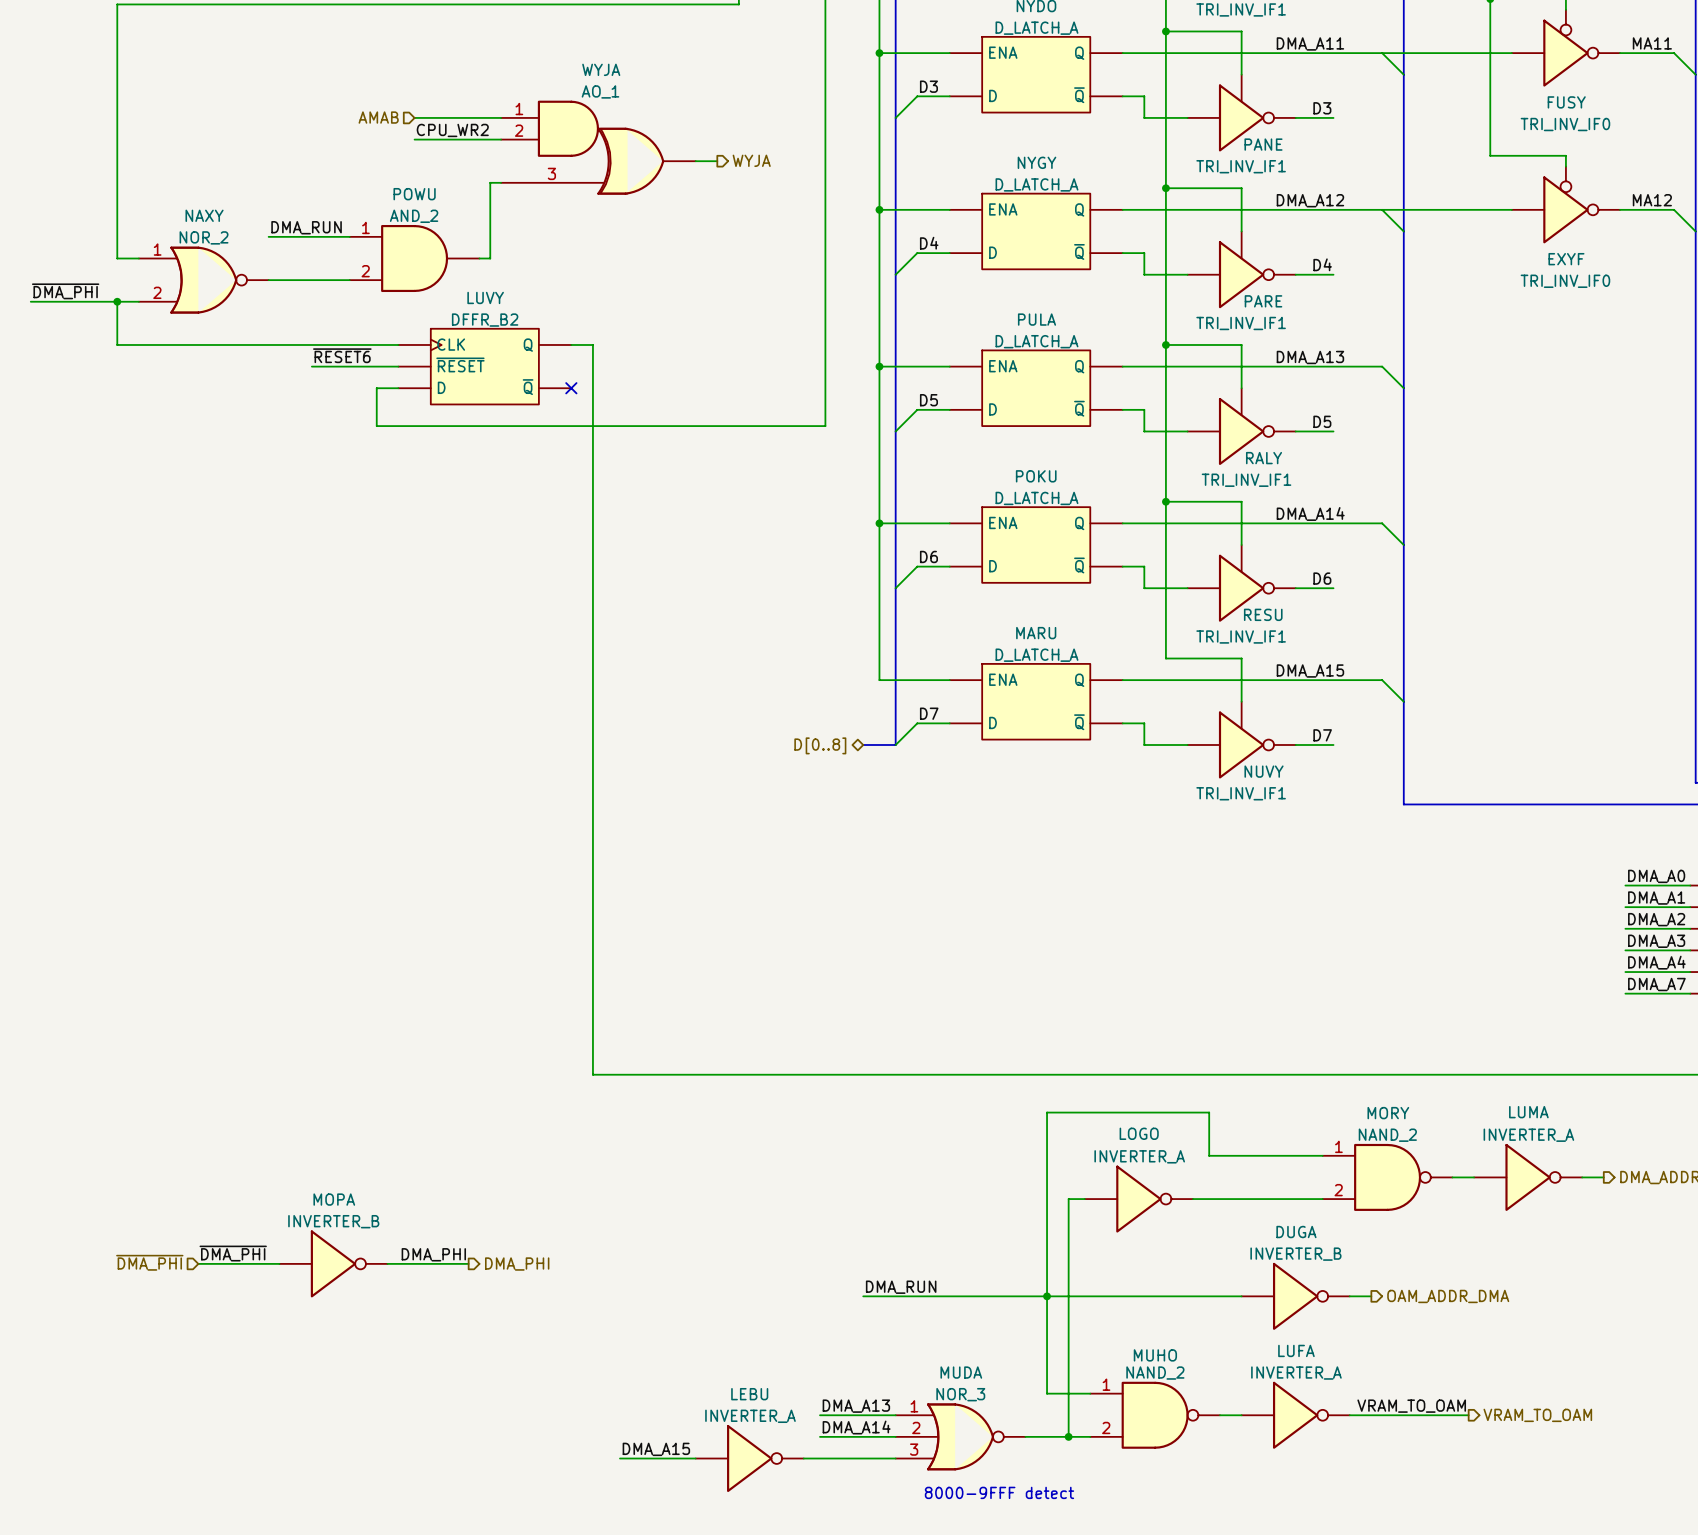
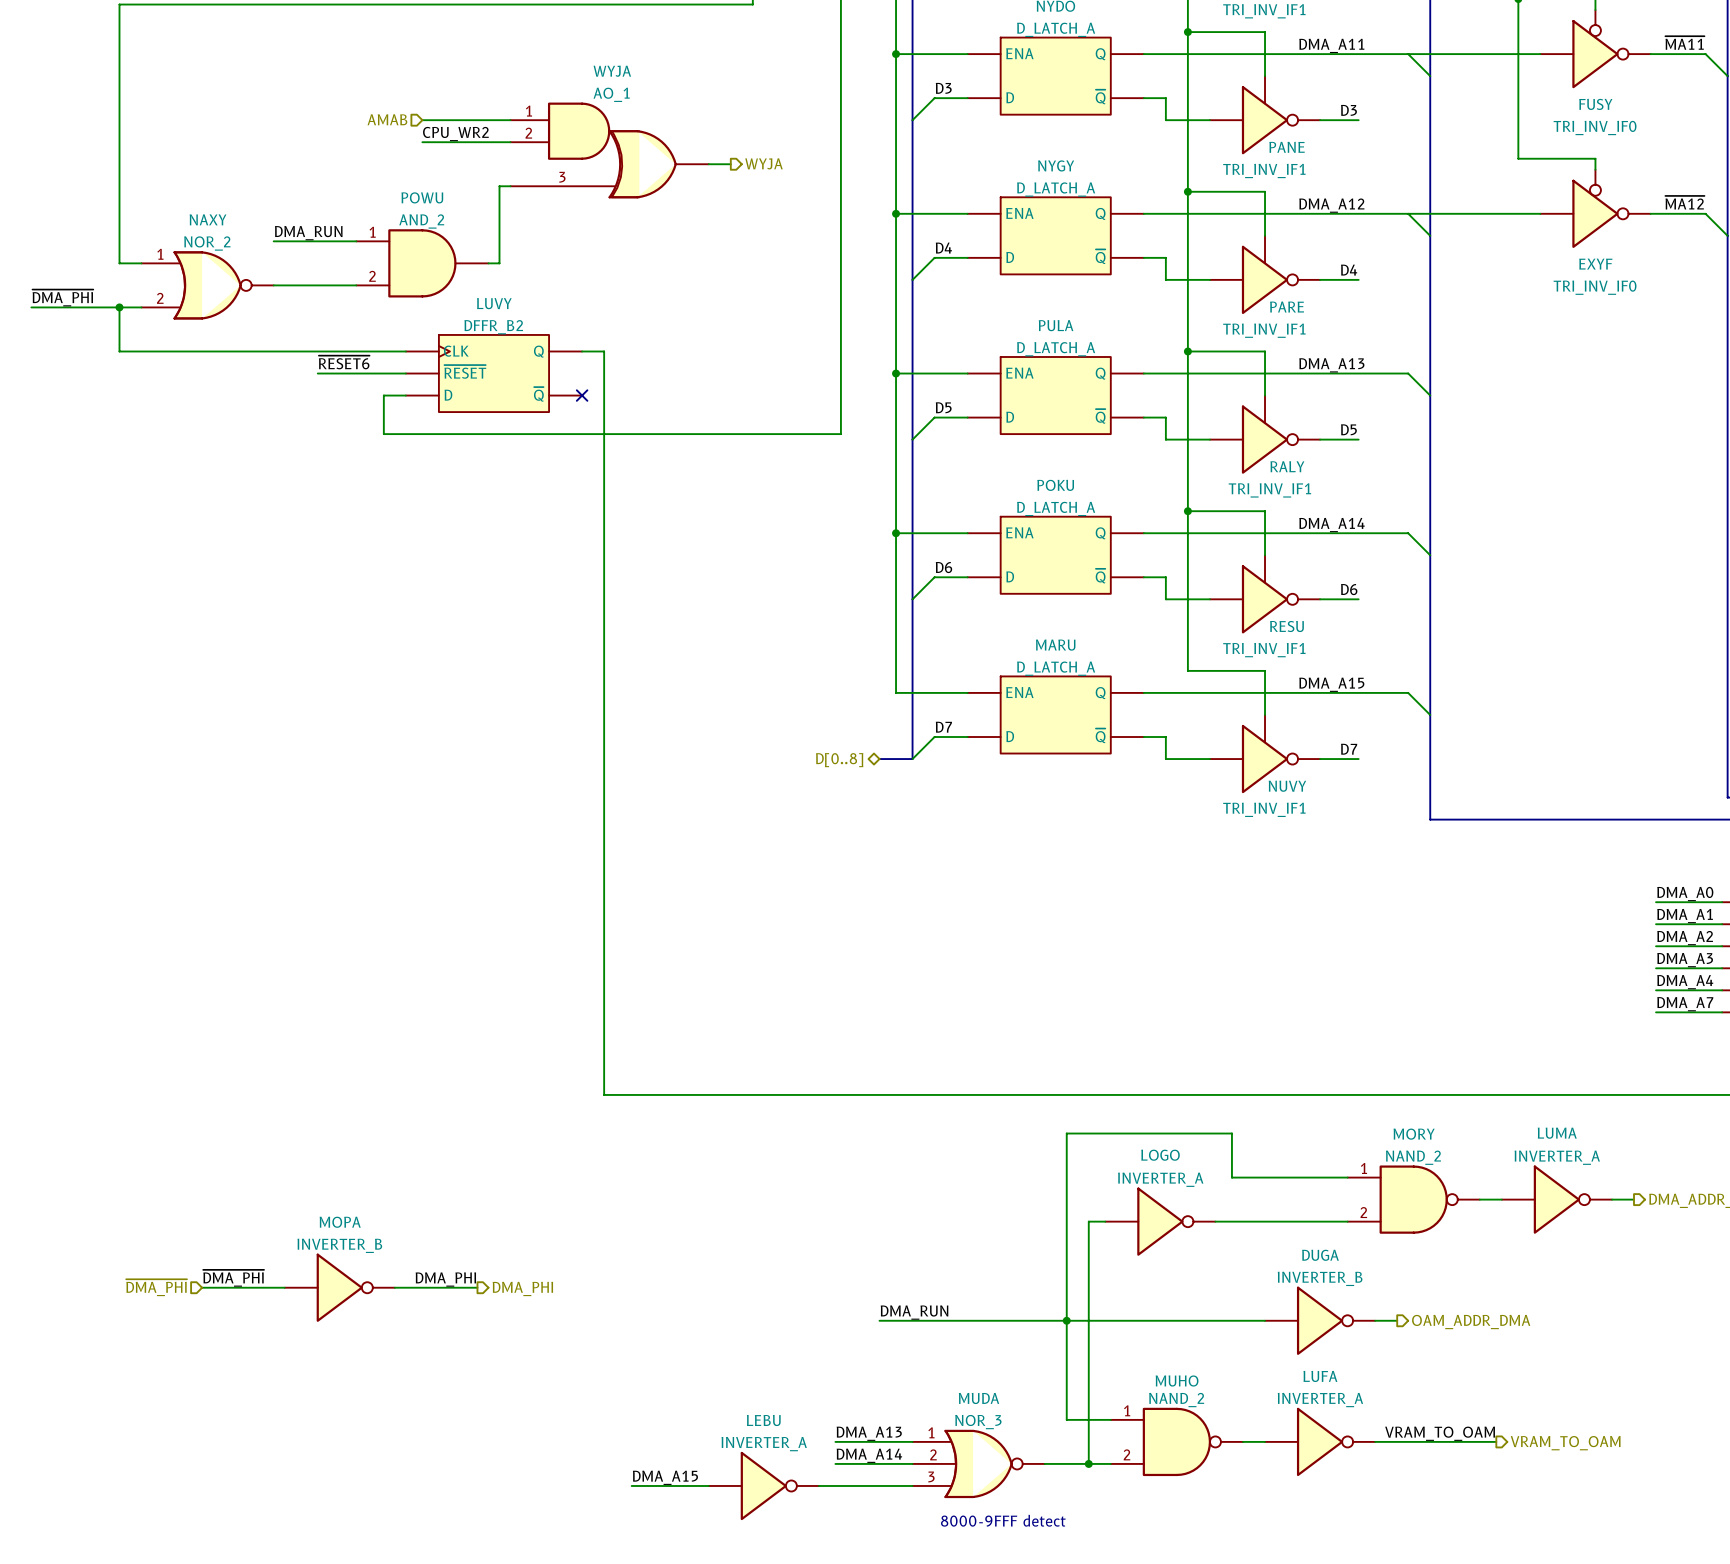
label: MA11 (1652, 43) -> ~{MA11} (1684, 43)
label: MA12 (1652, 200) -> ~{MA12} (1684, 202)

